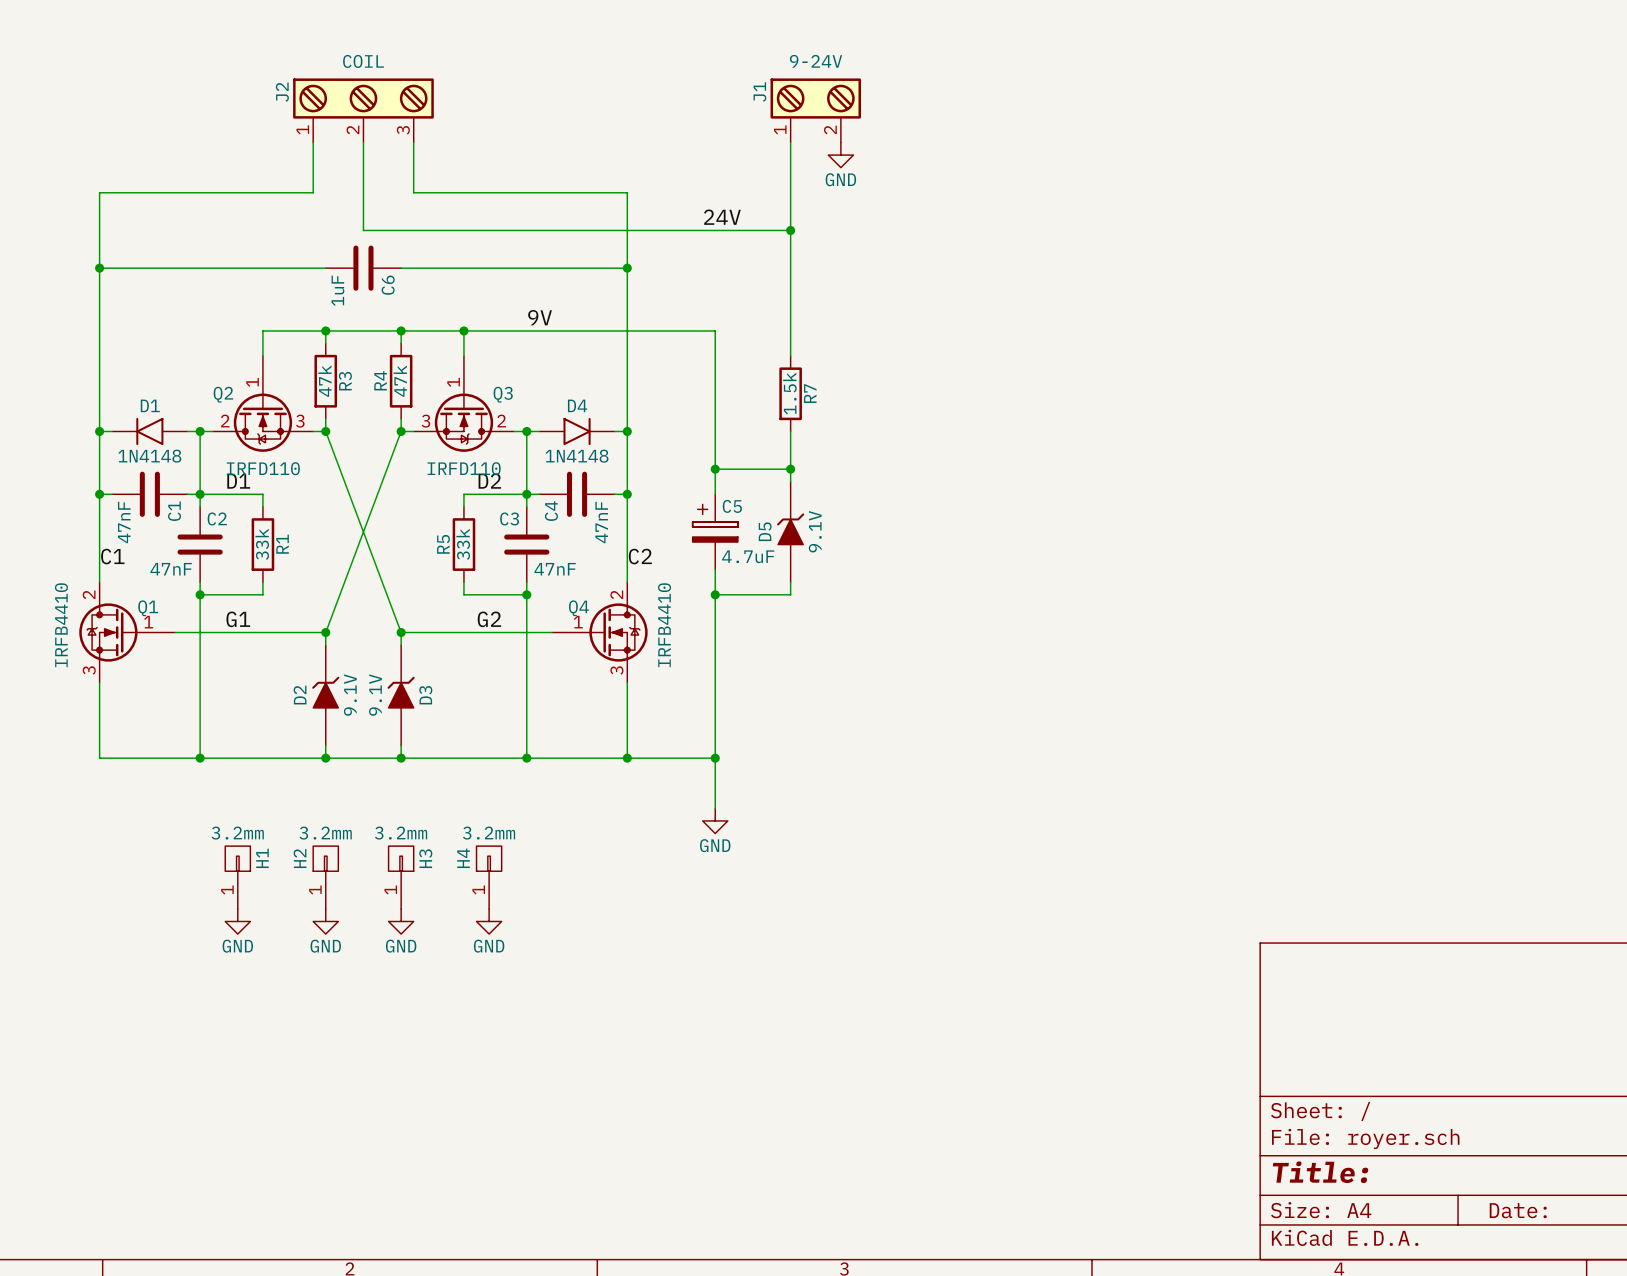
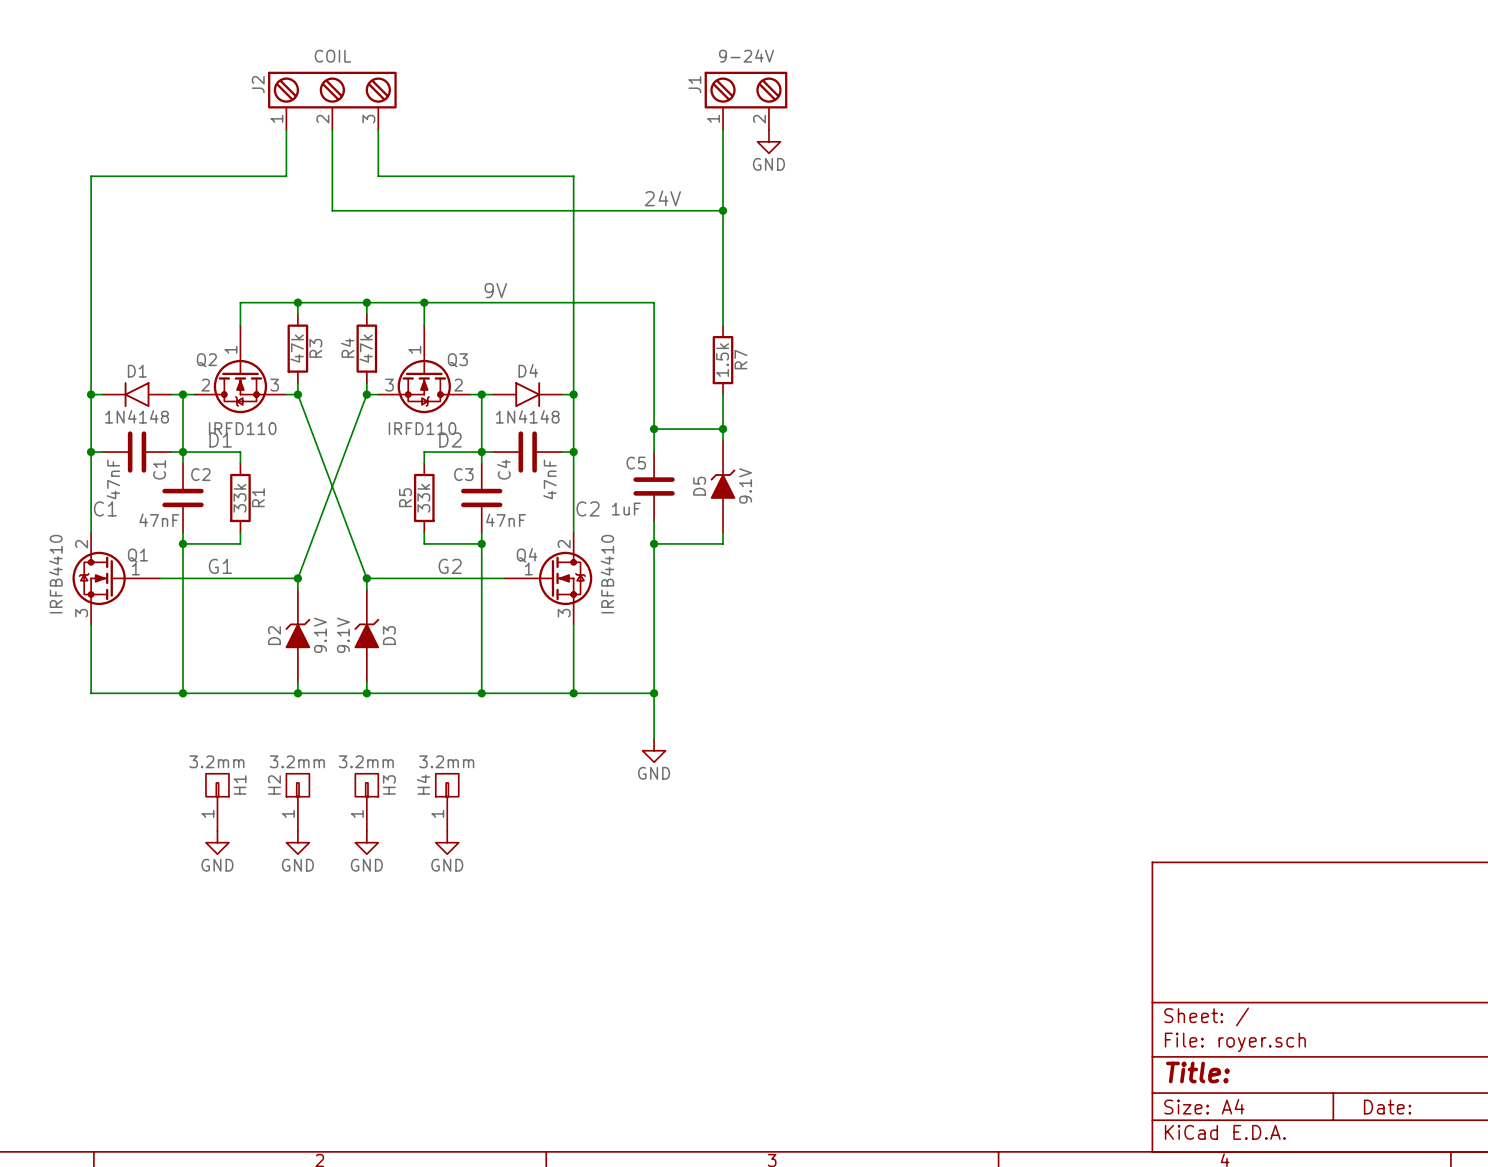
wire: (99, 268) (325, 268) -> none
junction: (99, 268) -> none
C6: 1uF (363, 268) -> none
wire: (401, 268) (627, 268) -> none
junction: (627, 268) -> none
C5 symbol: [692, 494, 738, 570] -> [633, 452, 675, 521]
C5 name position: C5 (732, 506) -> C5 (636, 463)
C5 value: 4.7uF (748, 556) -> 1uF (626, 509)

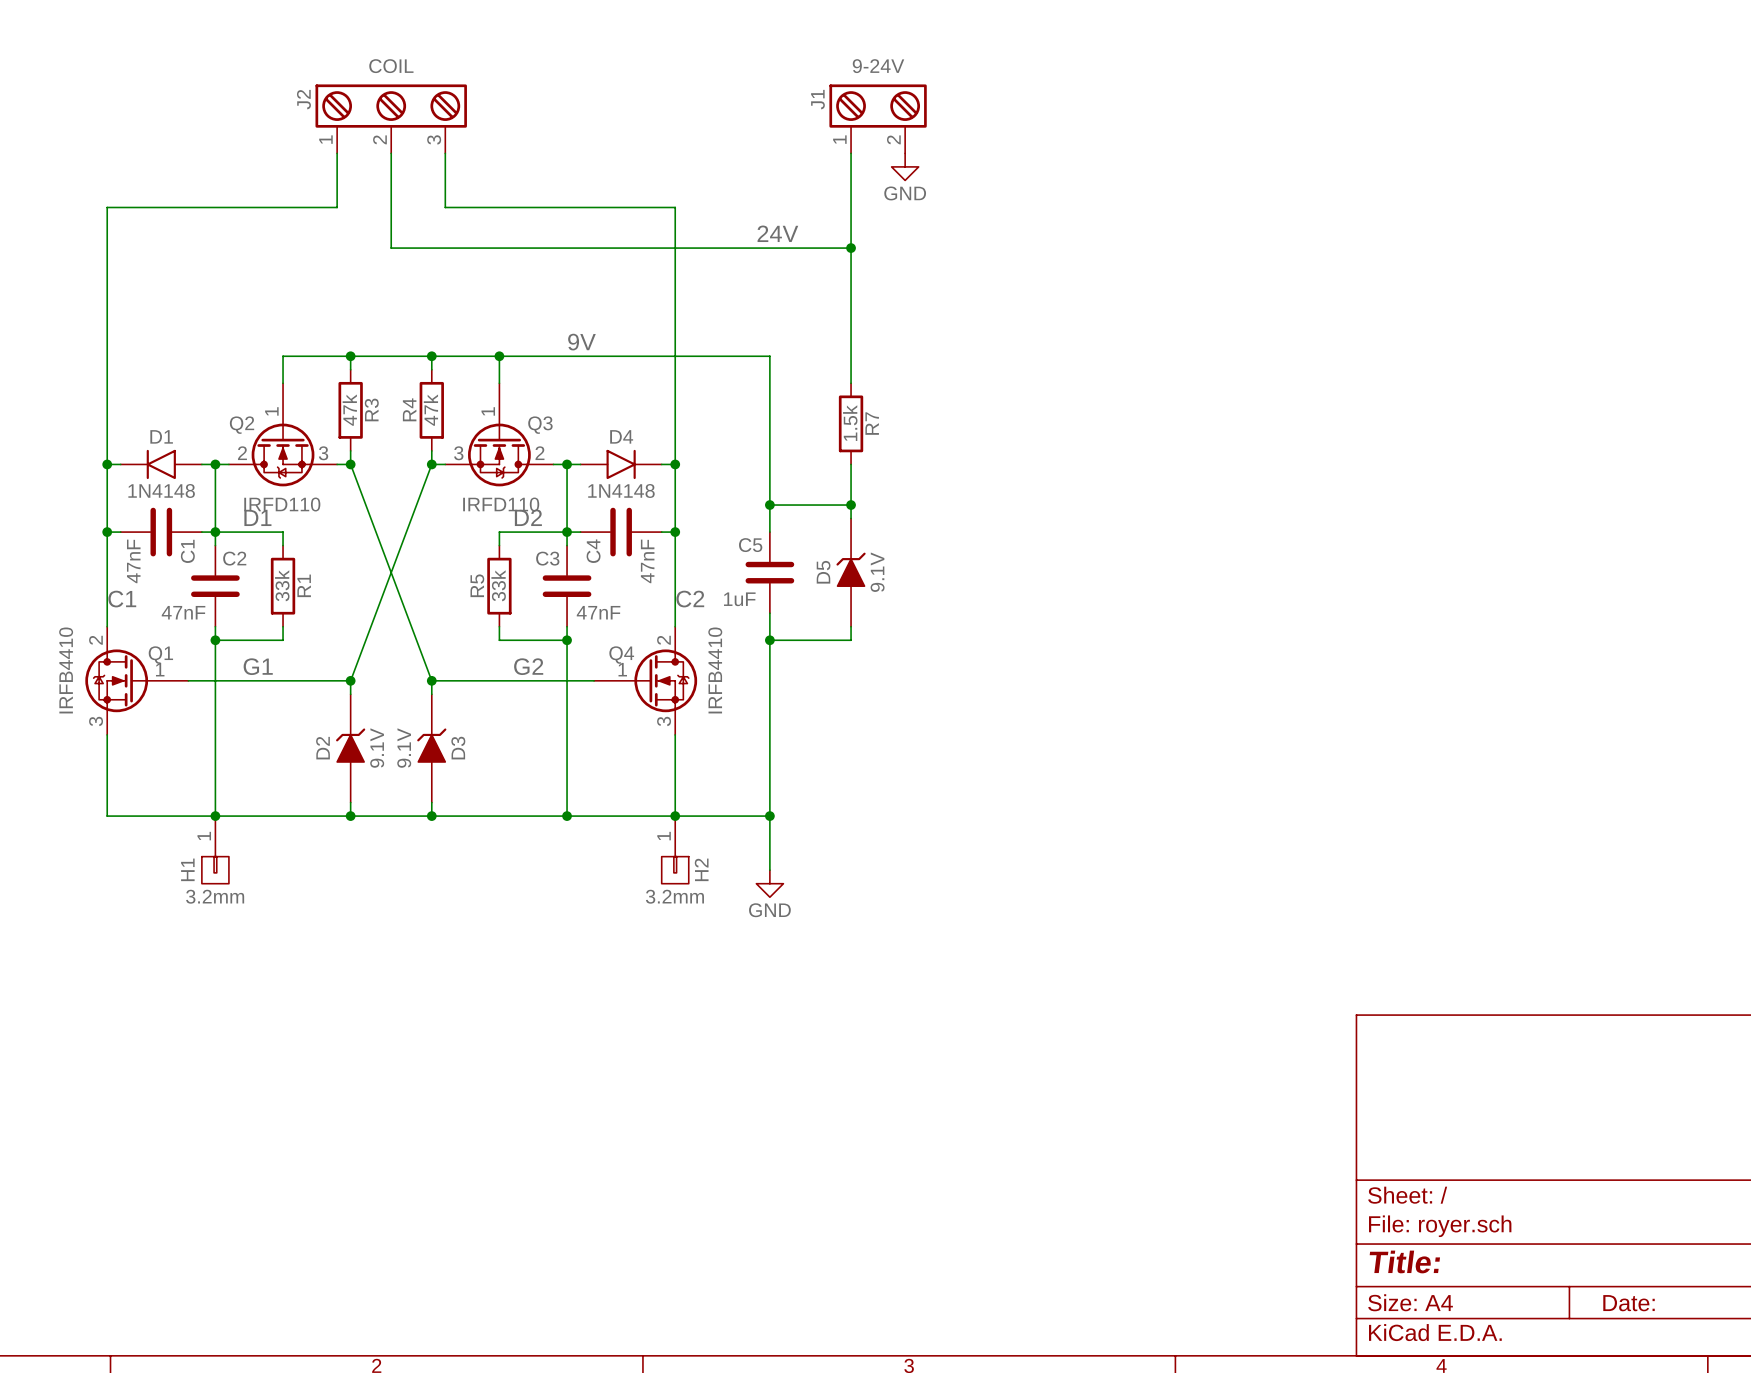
H1 rotation: 0° (217, 785) -> 180° (215, 870)
H2 rotation: 0° (297, 785) -> 180° (675, 870)
H1 position: (217, 802) -> (215, 849)
H2 position: (297, 802) -> (675, 849)
H3: 3.2mm (366, 802) -> none
H4: 3.2mm (447, 802) -> none
power symbol: GND (217, 842) -> none
power symbol: GND (297, 842) -> none
power symbol: GND (366, 842) -> none
power symbol: GND (447, 842) -> none

